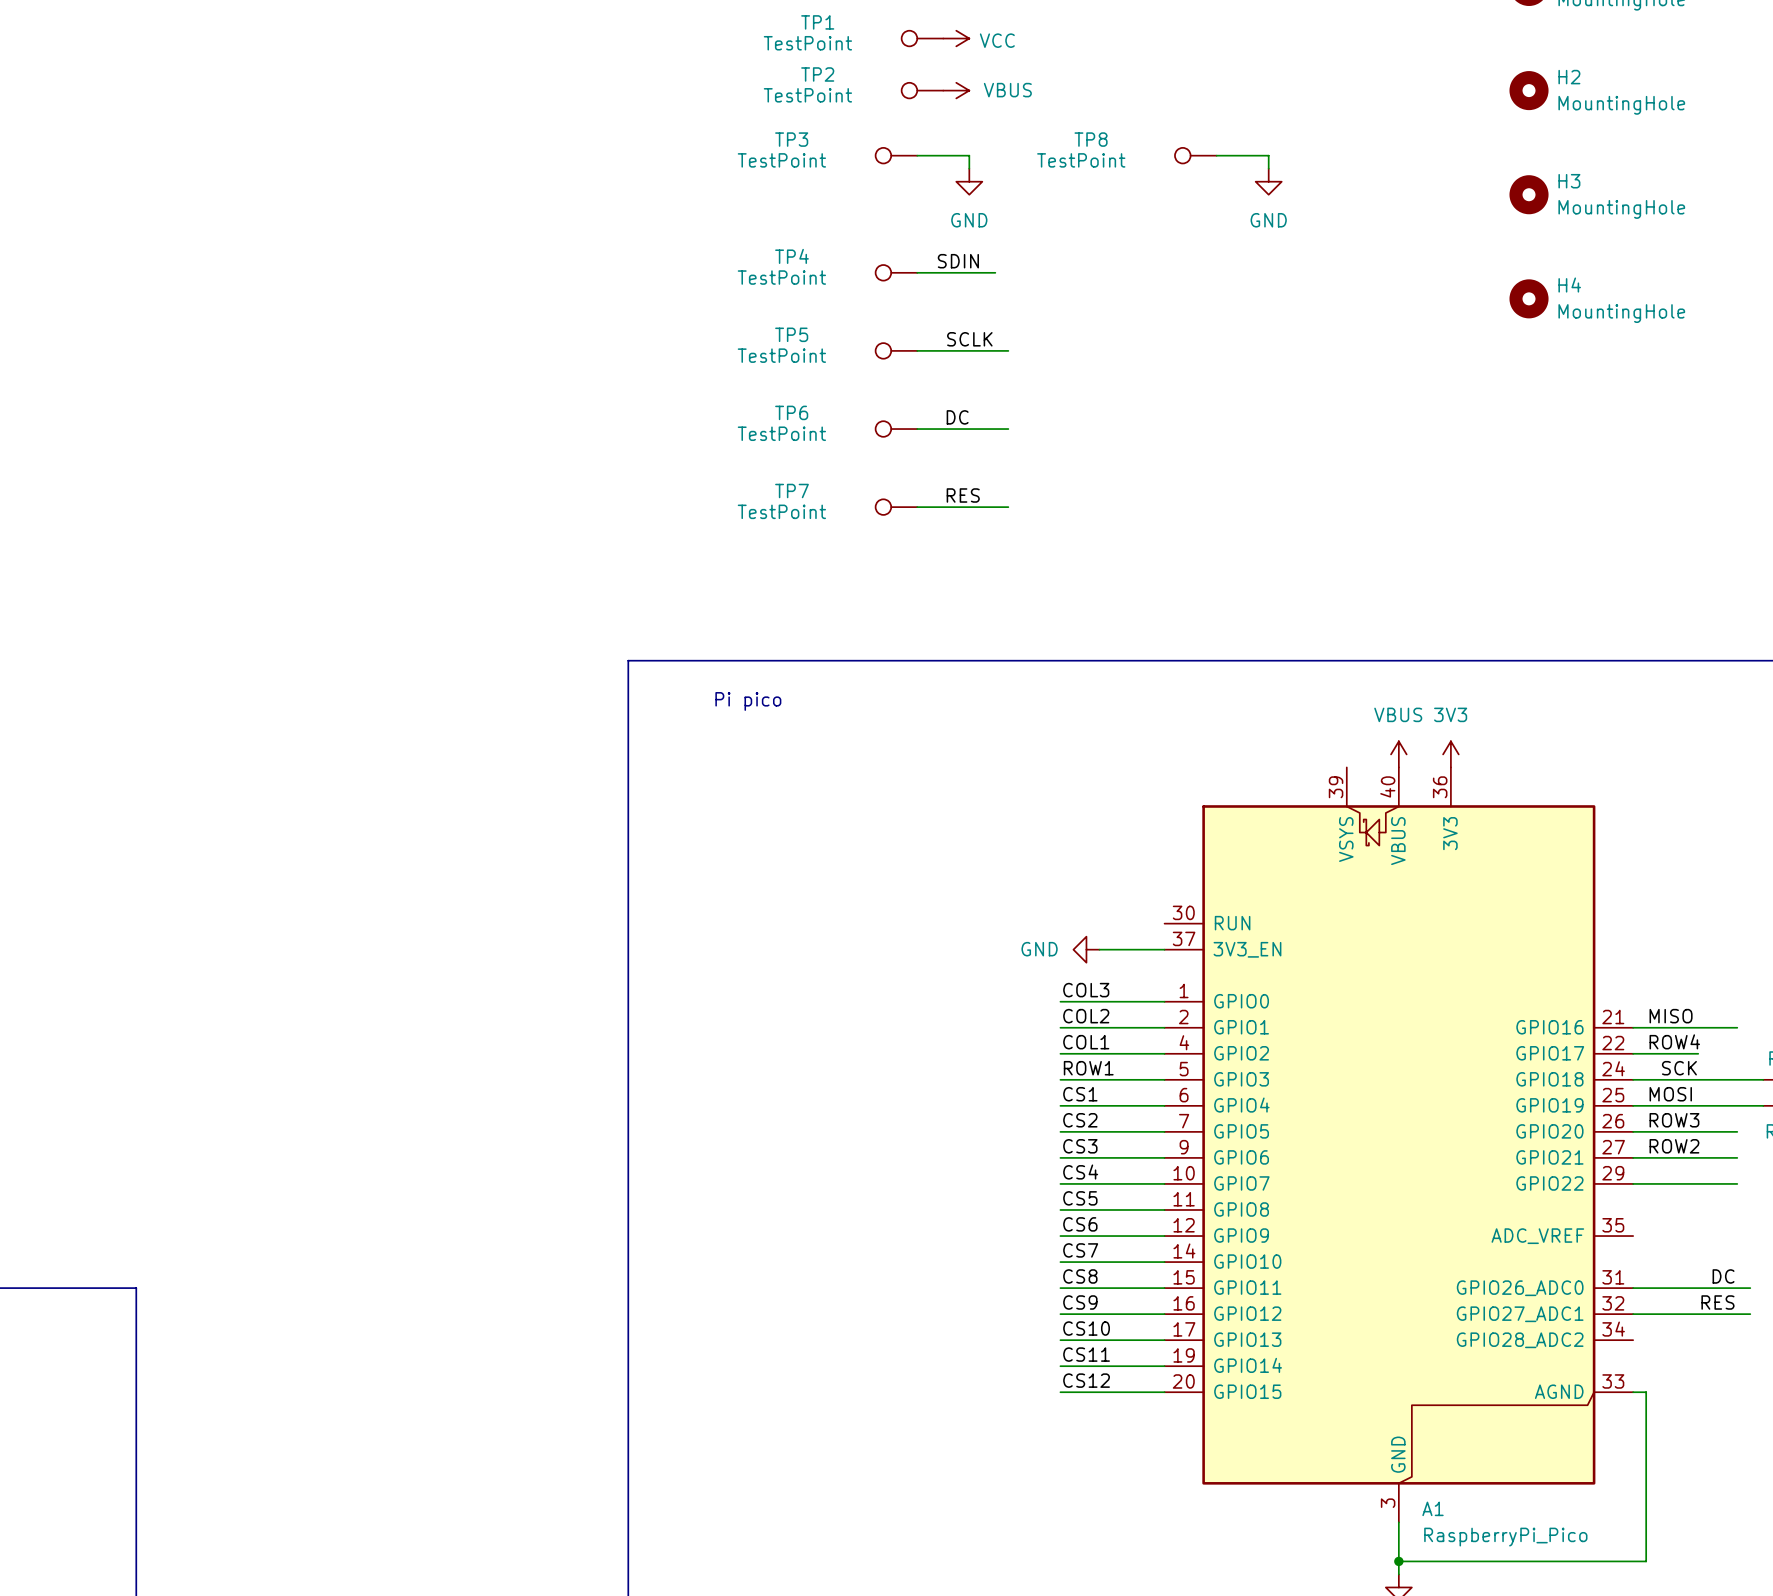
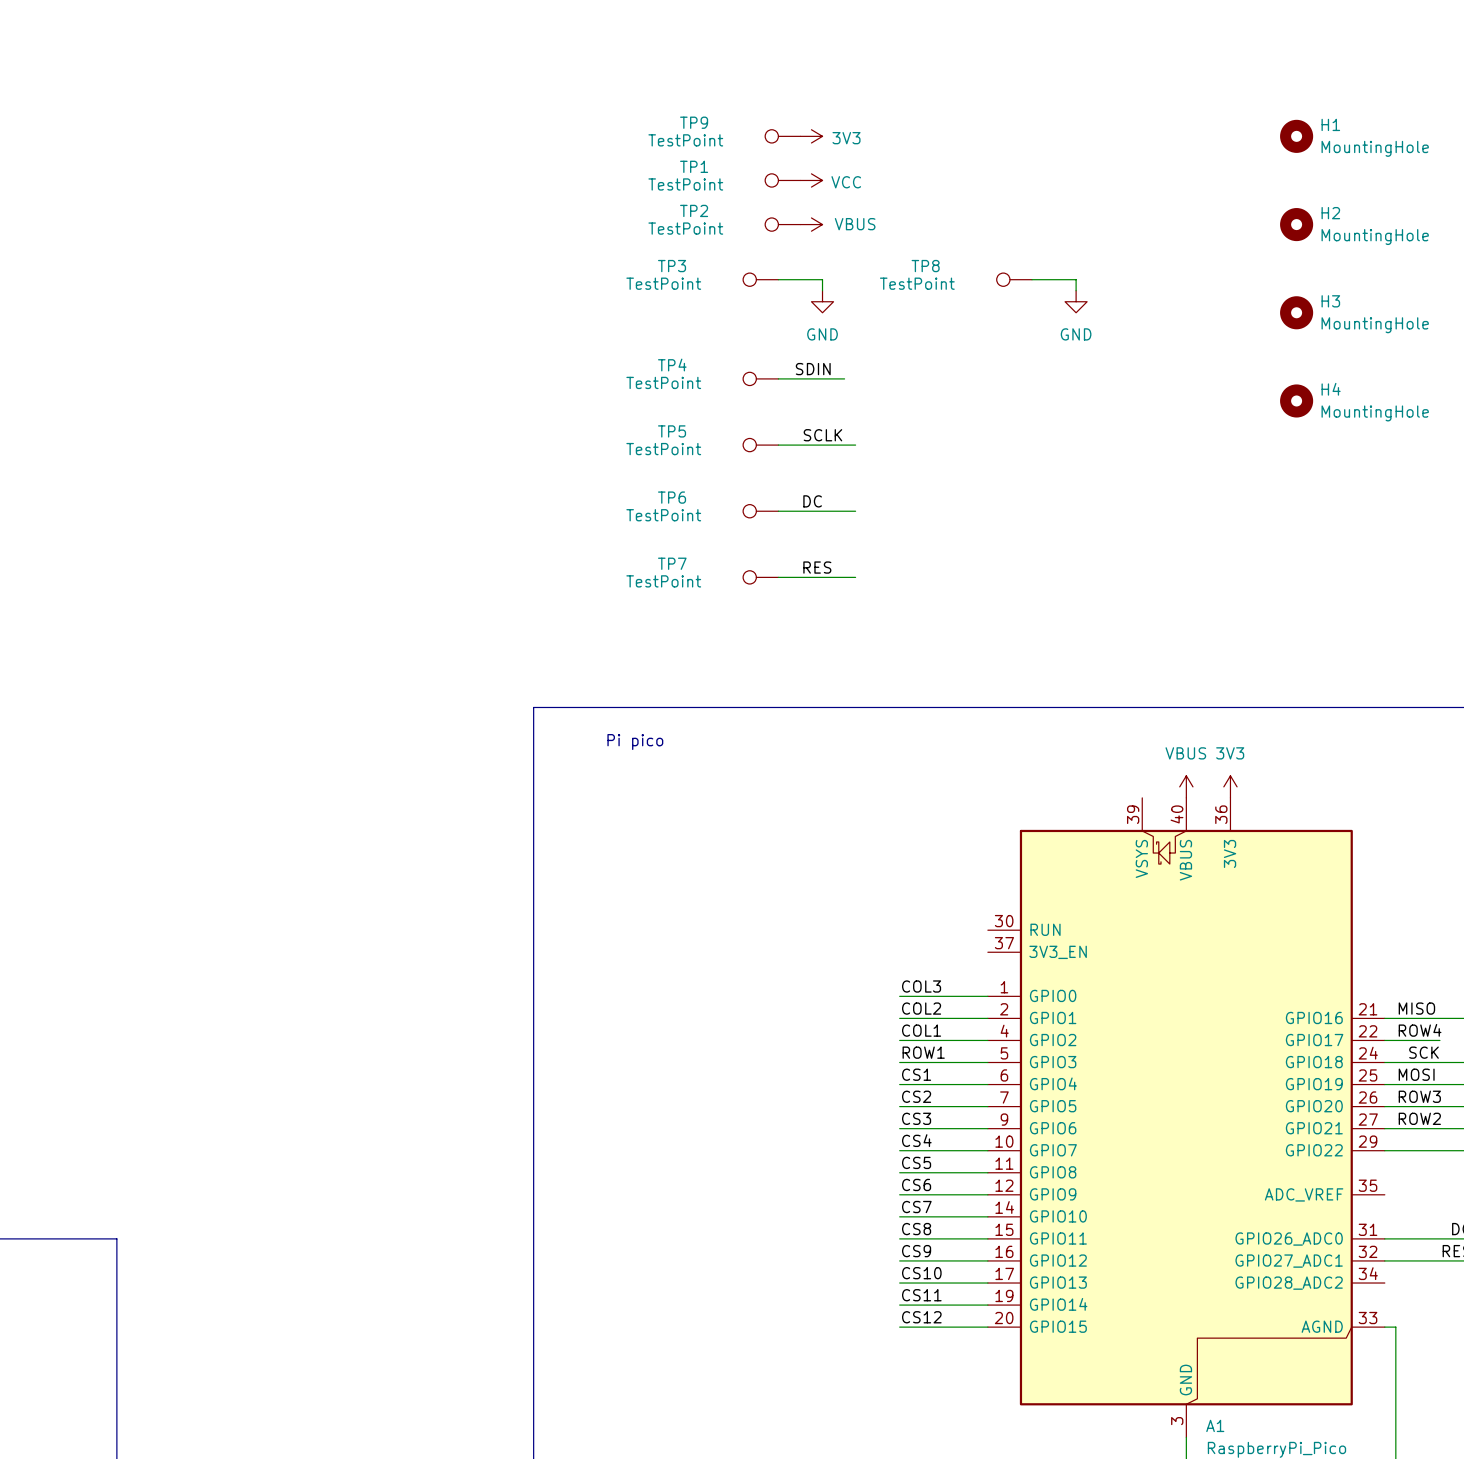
power symbol: GND (1086, 949) -> none
wire: (1099, 949) (1164, 949) -> none

